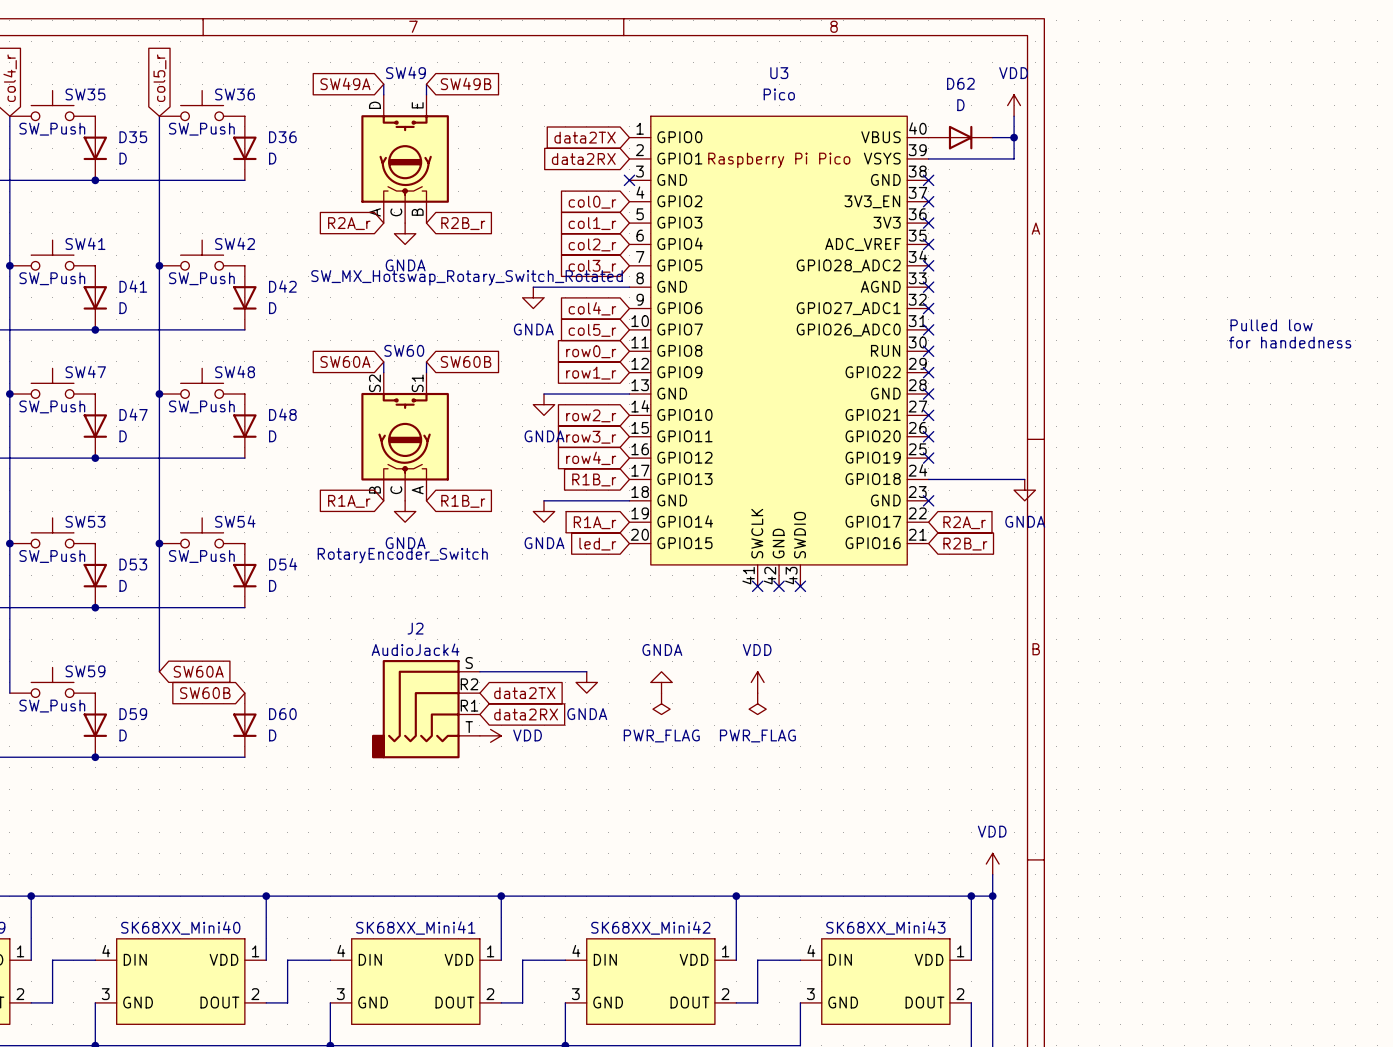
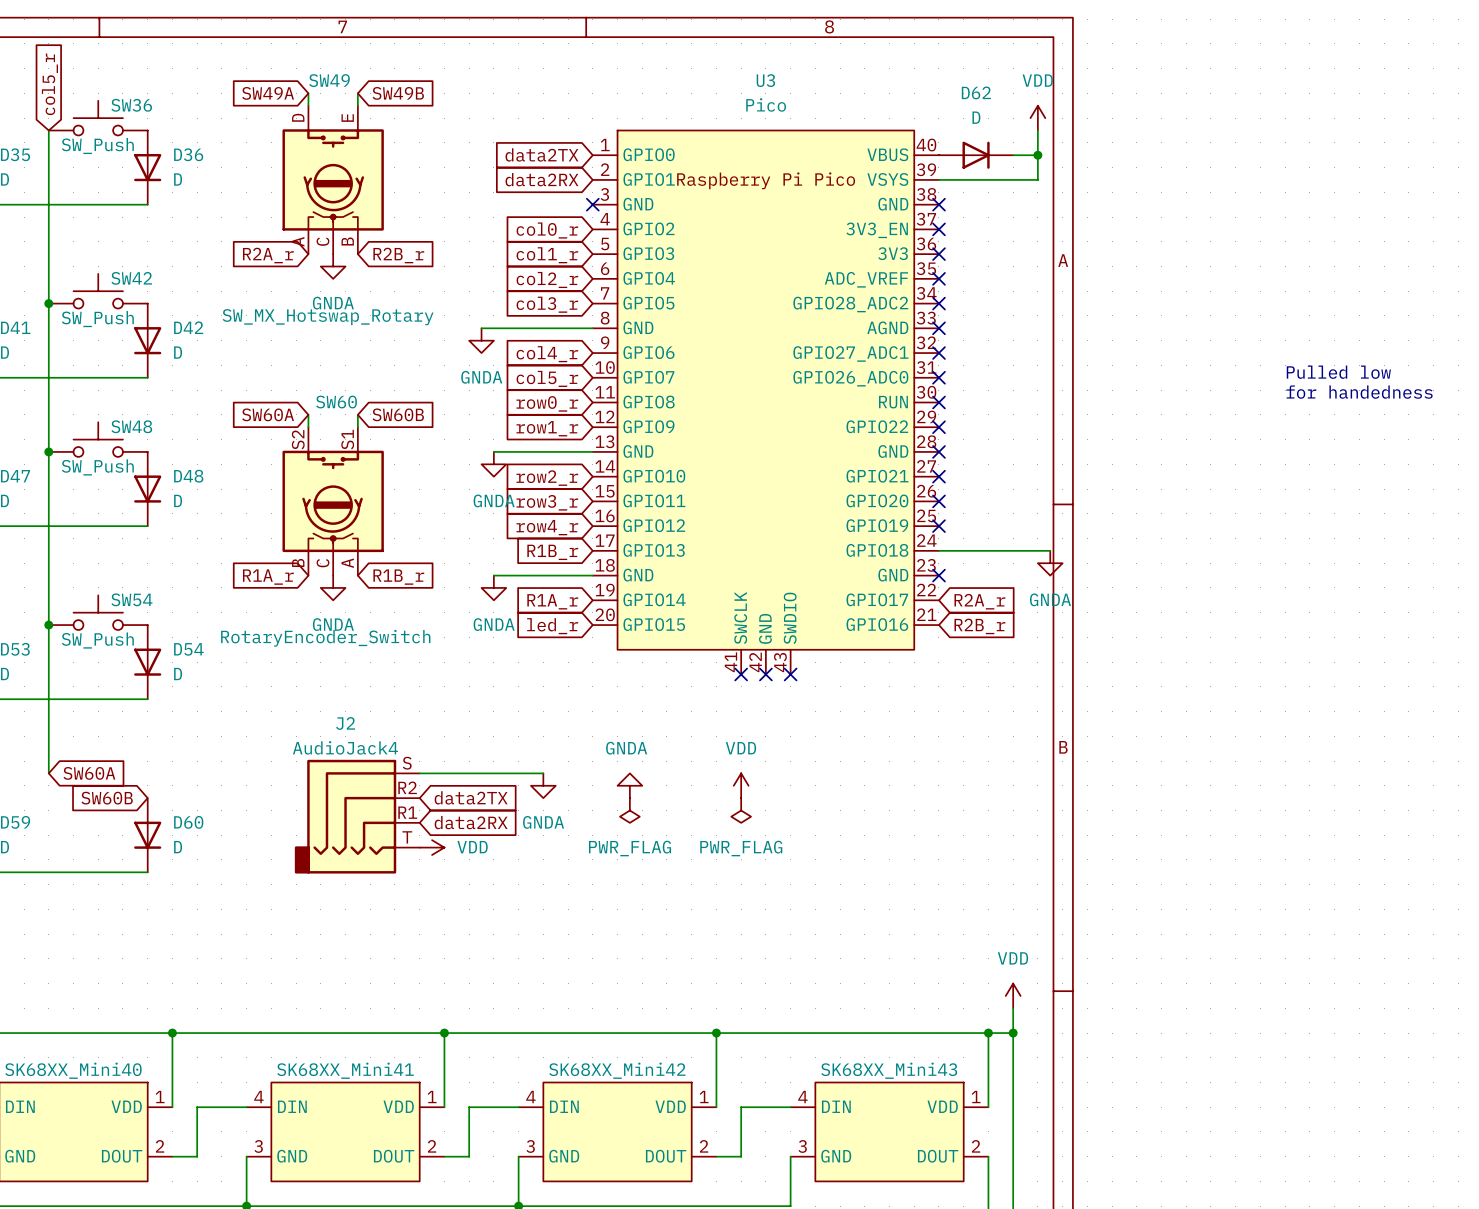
SW49 value: SW_MX_Hotswap_Rotary_Switch_Rotated (467, 277) -> SW_MX_Hotswap_Rotary (328, 317)

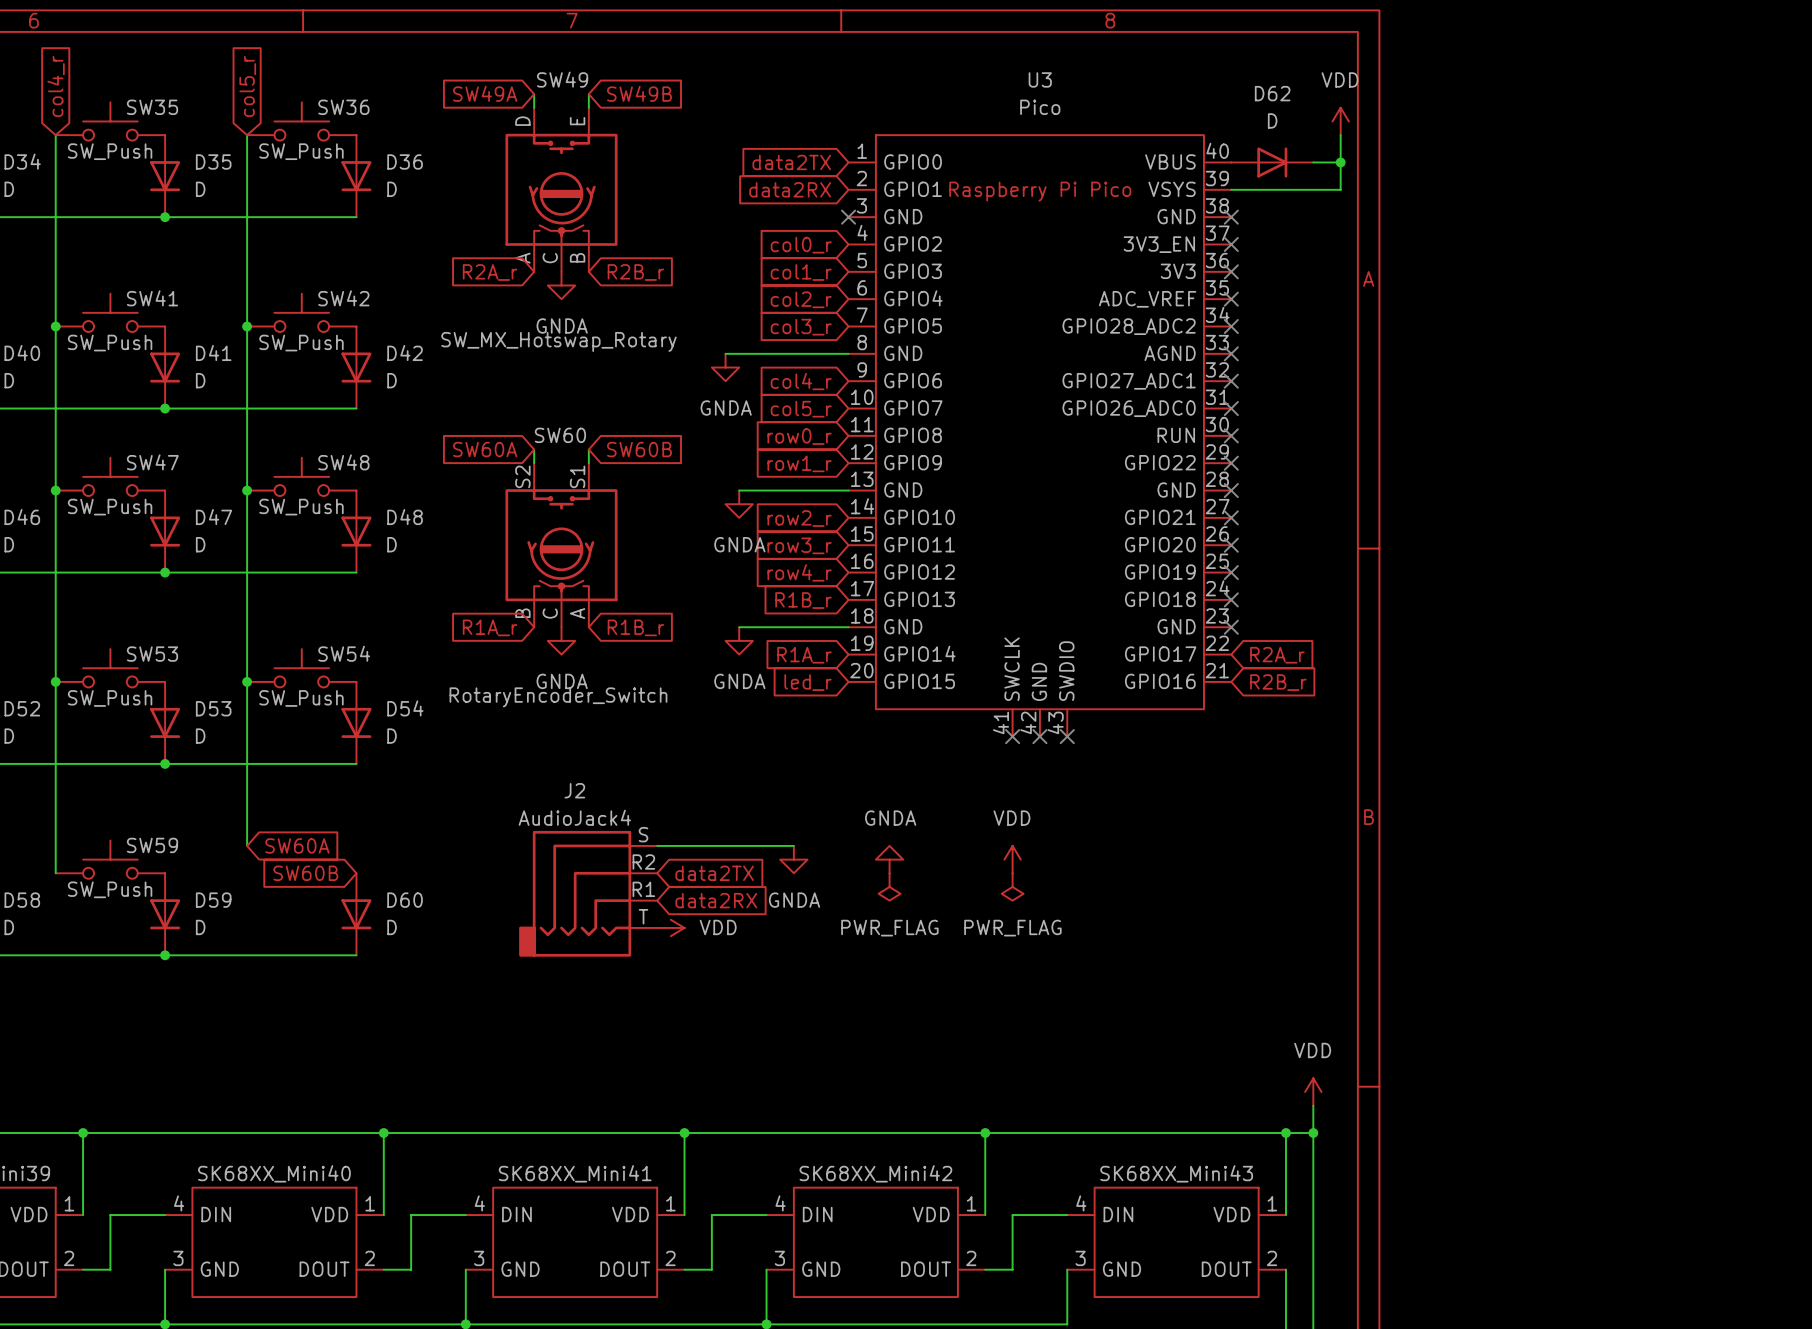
text: Pulled low (1338, 372) -> none
text: for handedness (1359, 392) -> none
wire: (938, 550) (1050, 550) -> none
no-connect mark: none -> (1231, 599)
power symbol: GNDA (1050, 563) -> none

